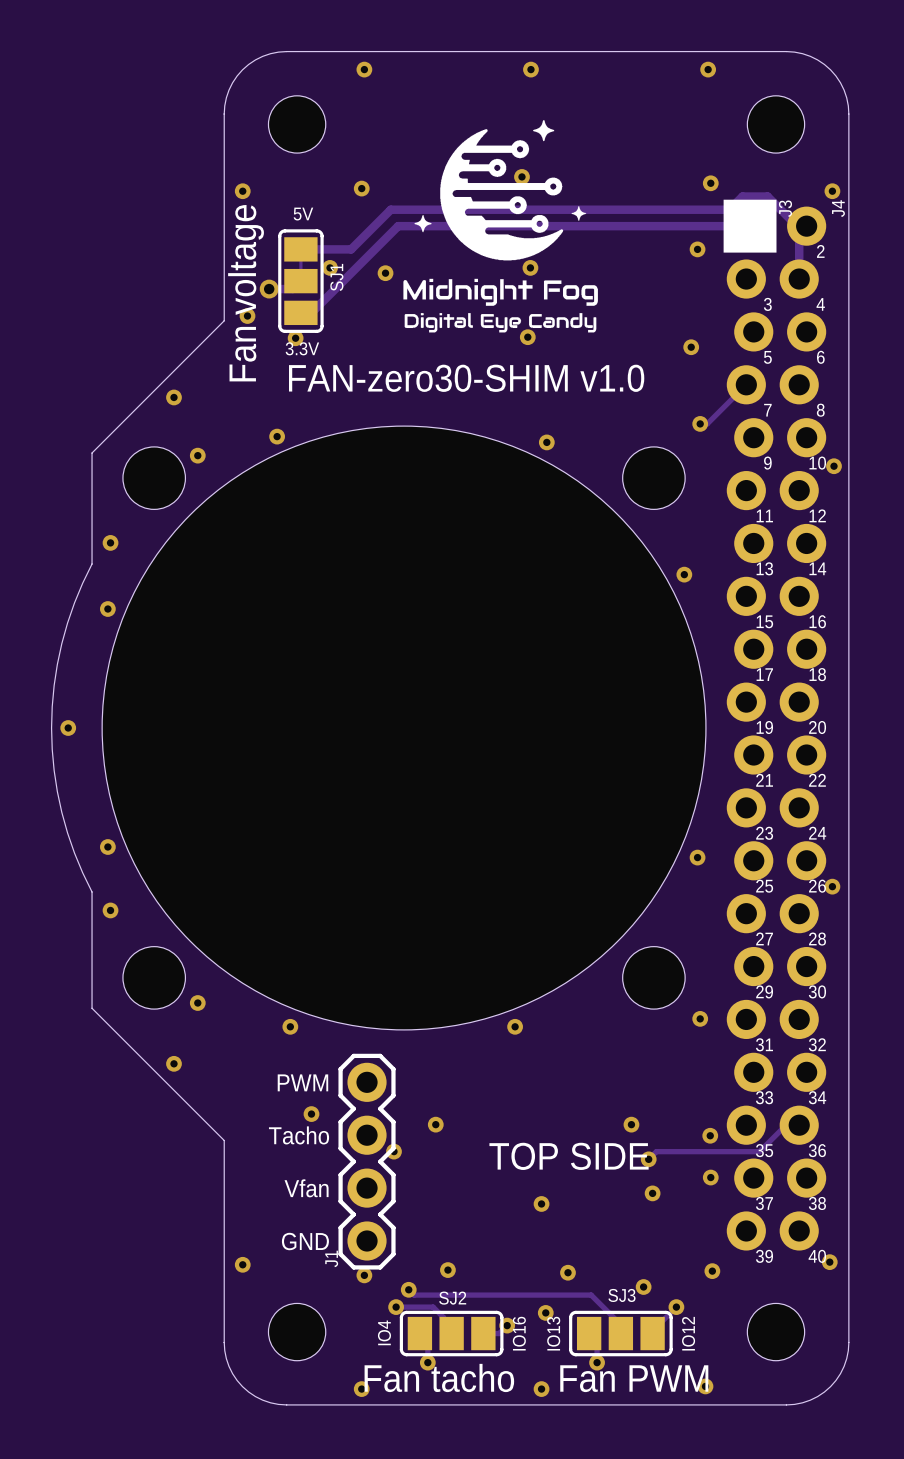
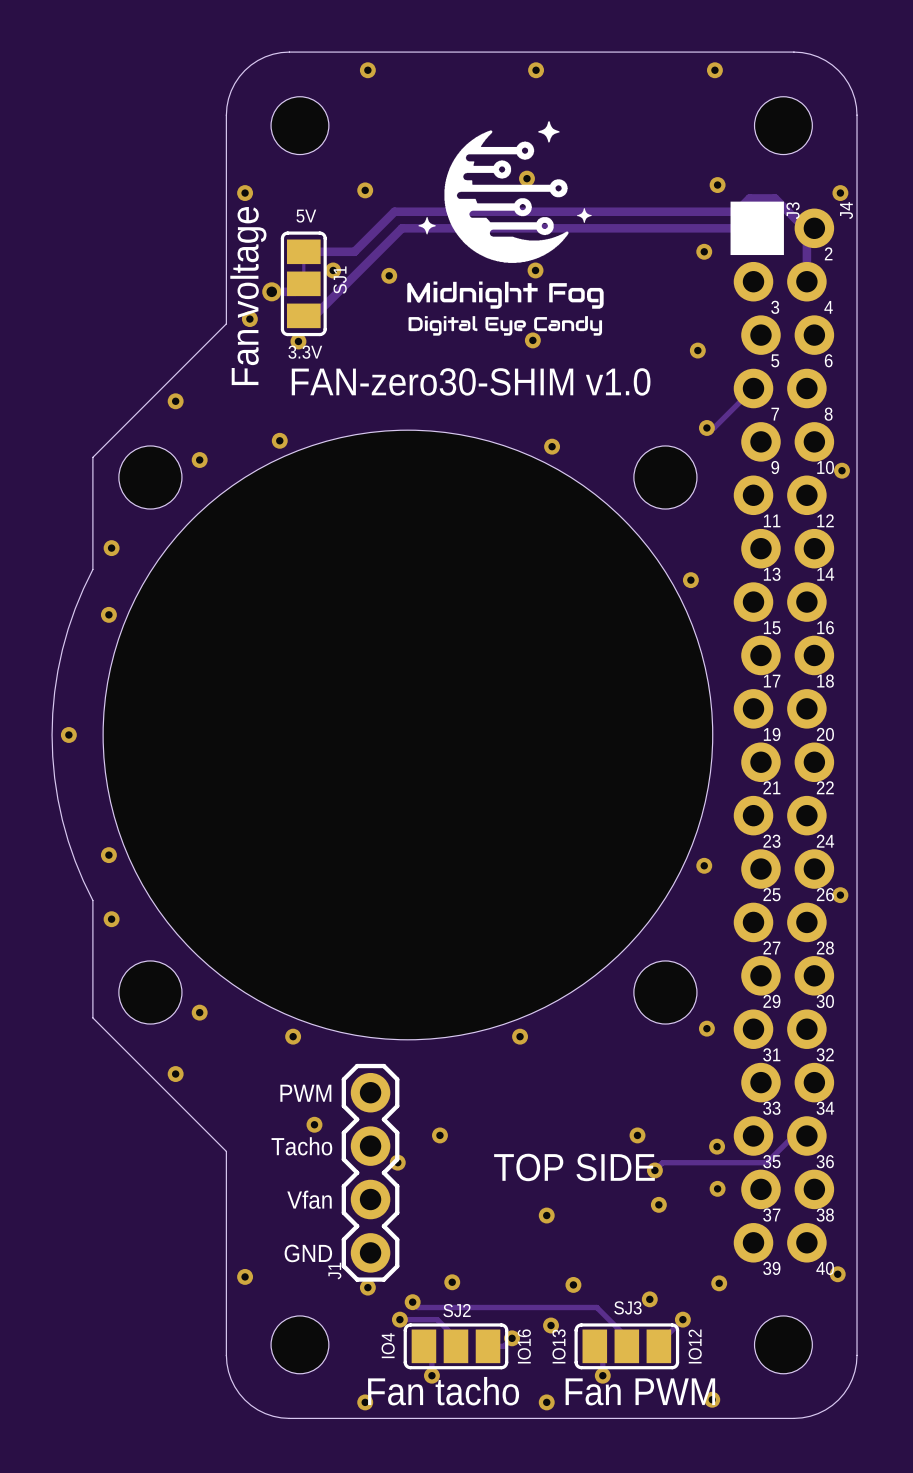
part footprint: [102, 426, 706, 1030] -> [103, 430, 713, 1040]

